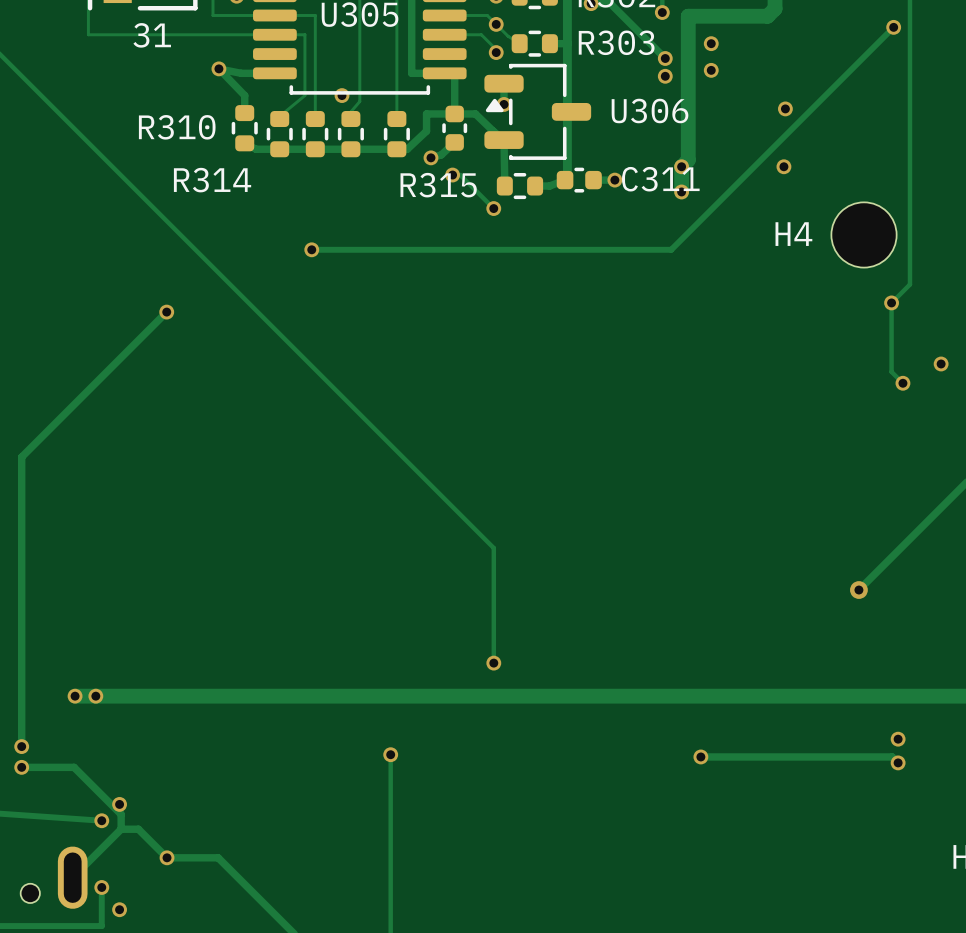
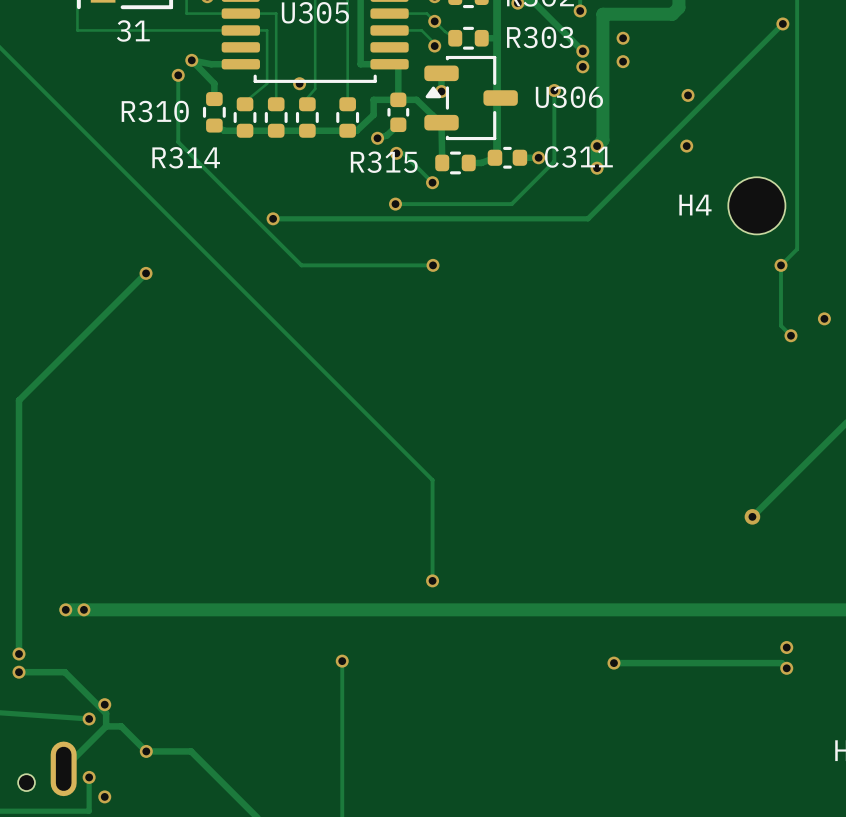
track: none -> (178, 75) (178, 142) (301, 265) (433, 265)
via: none -> (178, 75)
track: none -> (554, 90) (554, 161) (511, 204) (395, 204)
via: none -> (554, 90)
via: none -> (395, 204)
via: none -> (433, 265)

